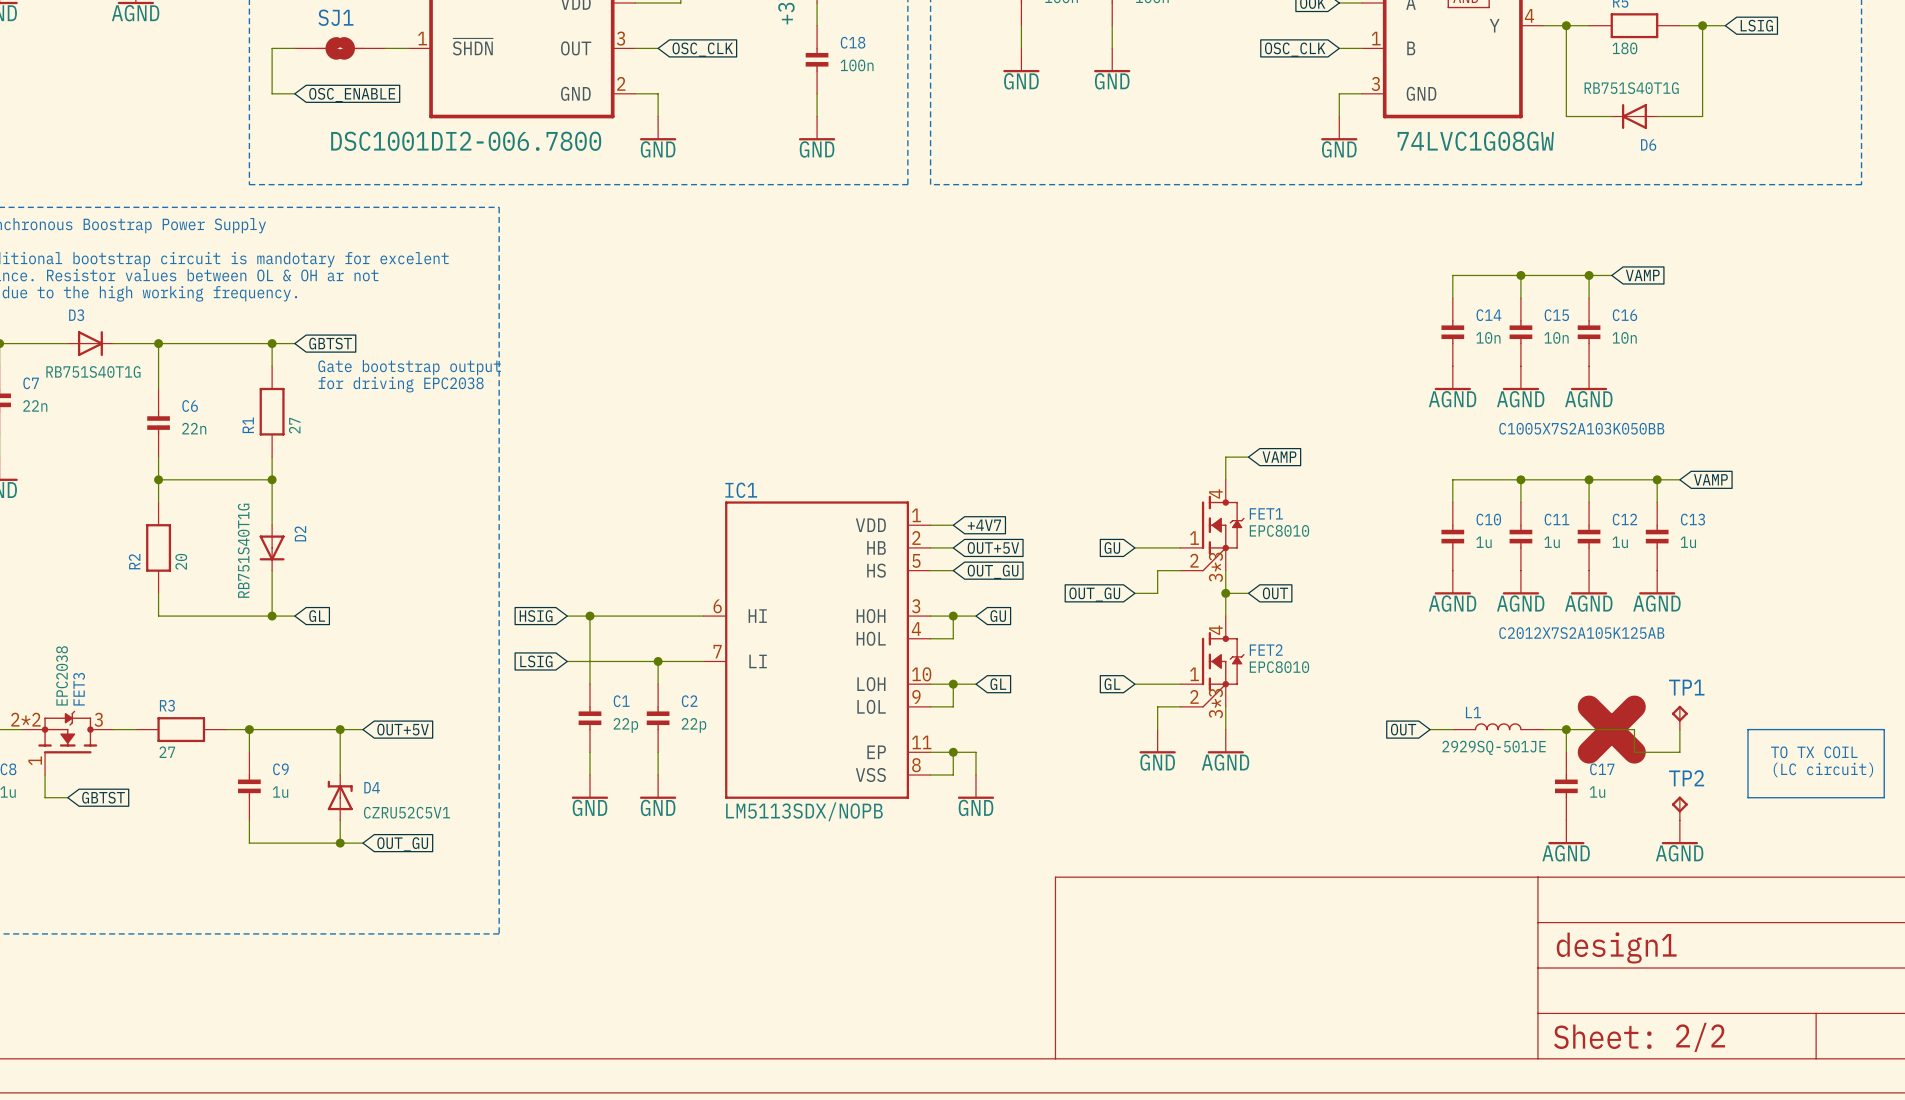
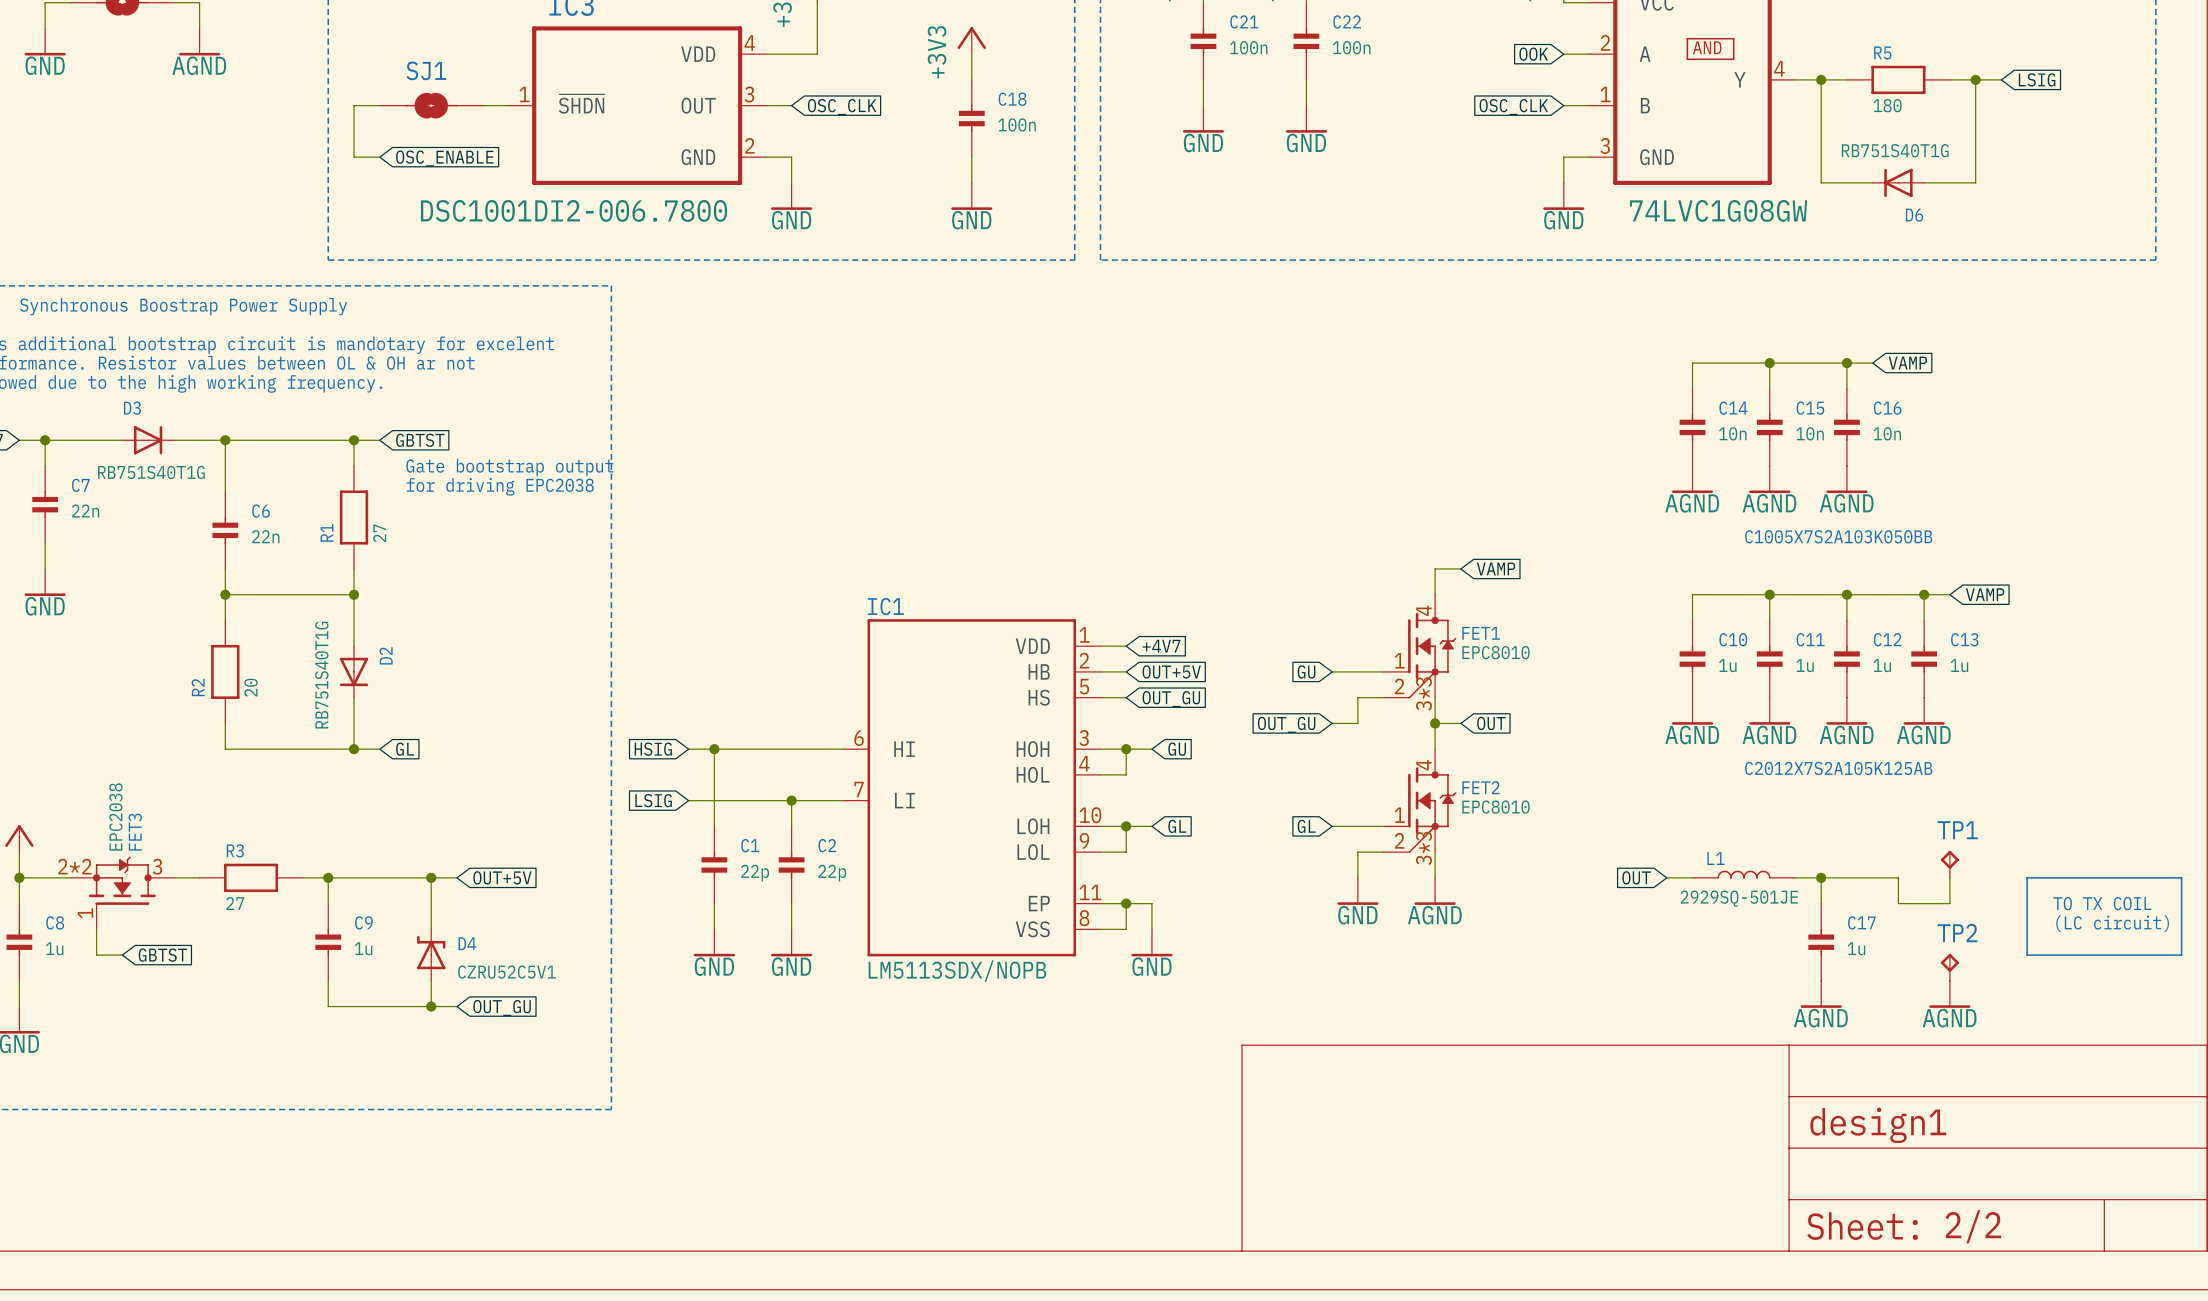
line: (1589, 706) (1634, 752) -> none
line: (1634, 706) (1589, 752) -> none

